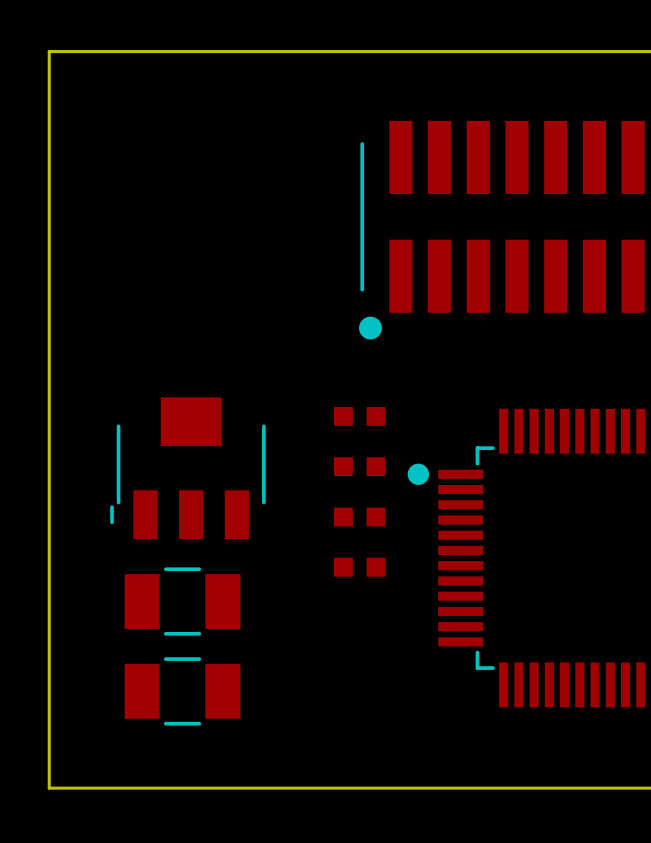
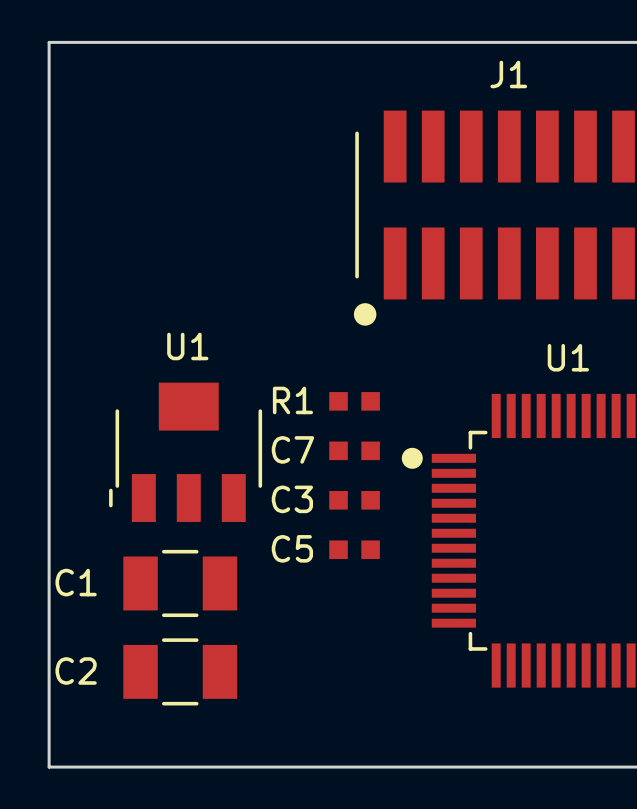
J1 name: none -> J1 (508, 74)
U1 name: none -> U1 (187, 346)
U1 name: none -> U1 (568, 357)
R1 name: none -> R1 (292, 400)
C7 name: none -> C7 (292, 449)
C3 name: none -> C3 (292, 499)
C5 name: none -> C5 (292, 548)
C1 name: none -> C1 (76, 582)
C2 name: none -> C2 (76, 671)

